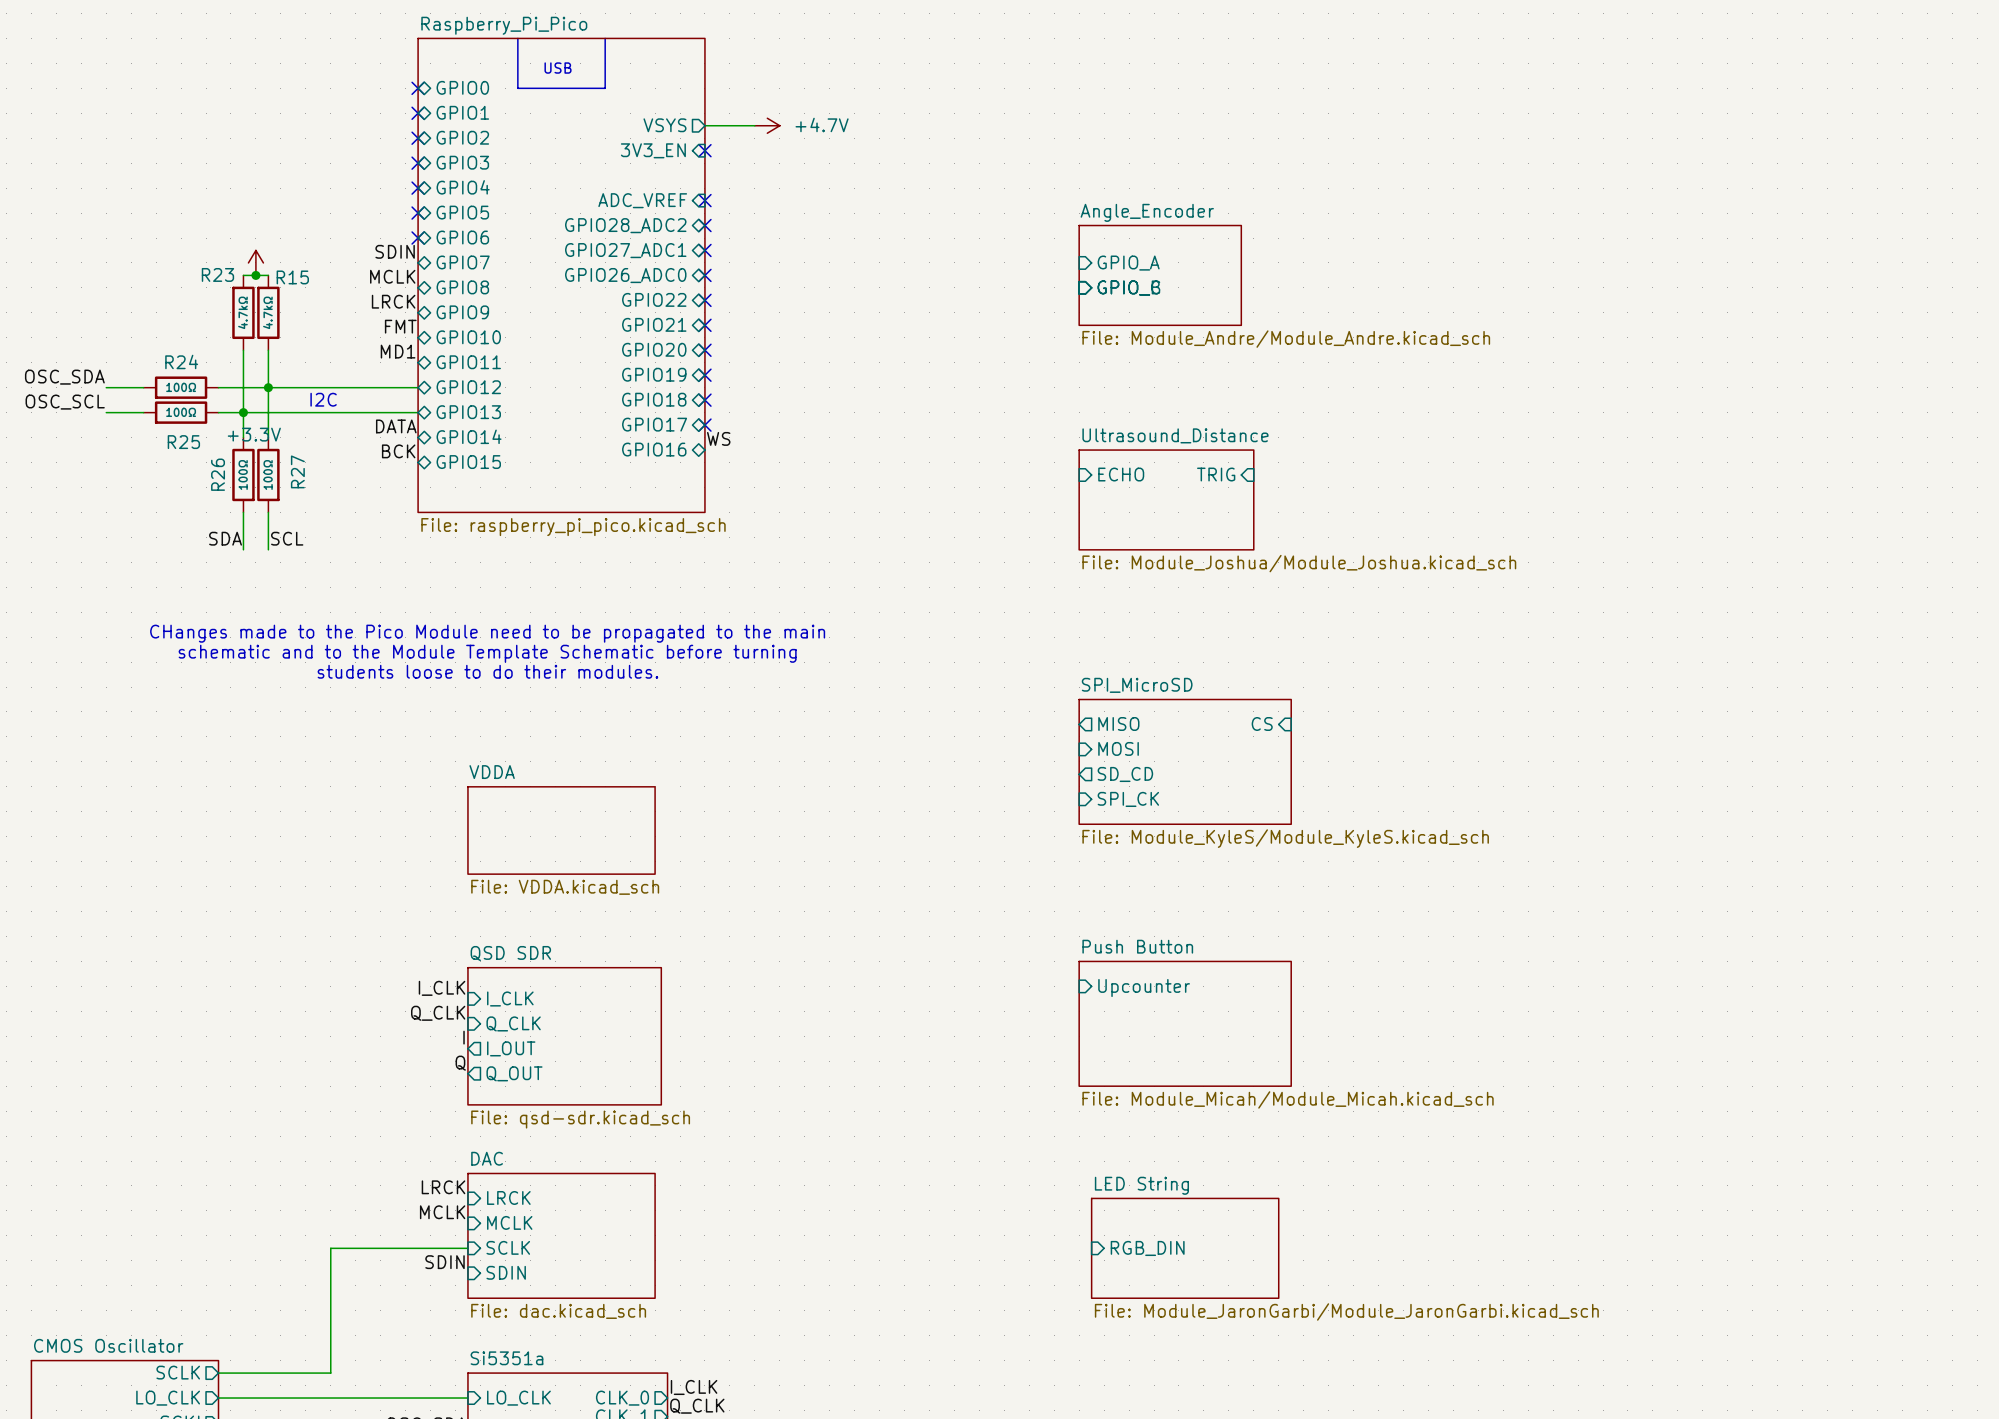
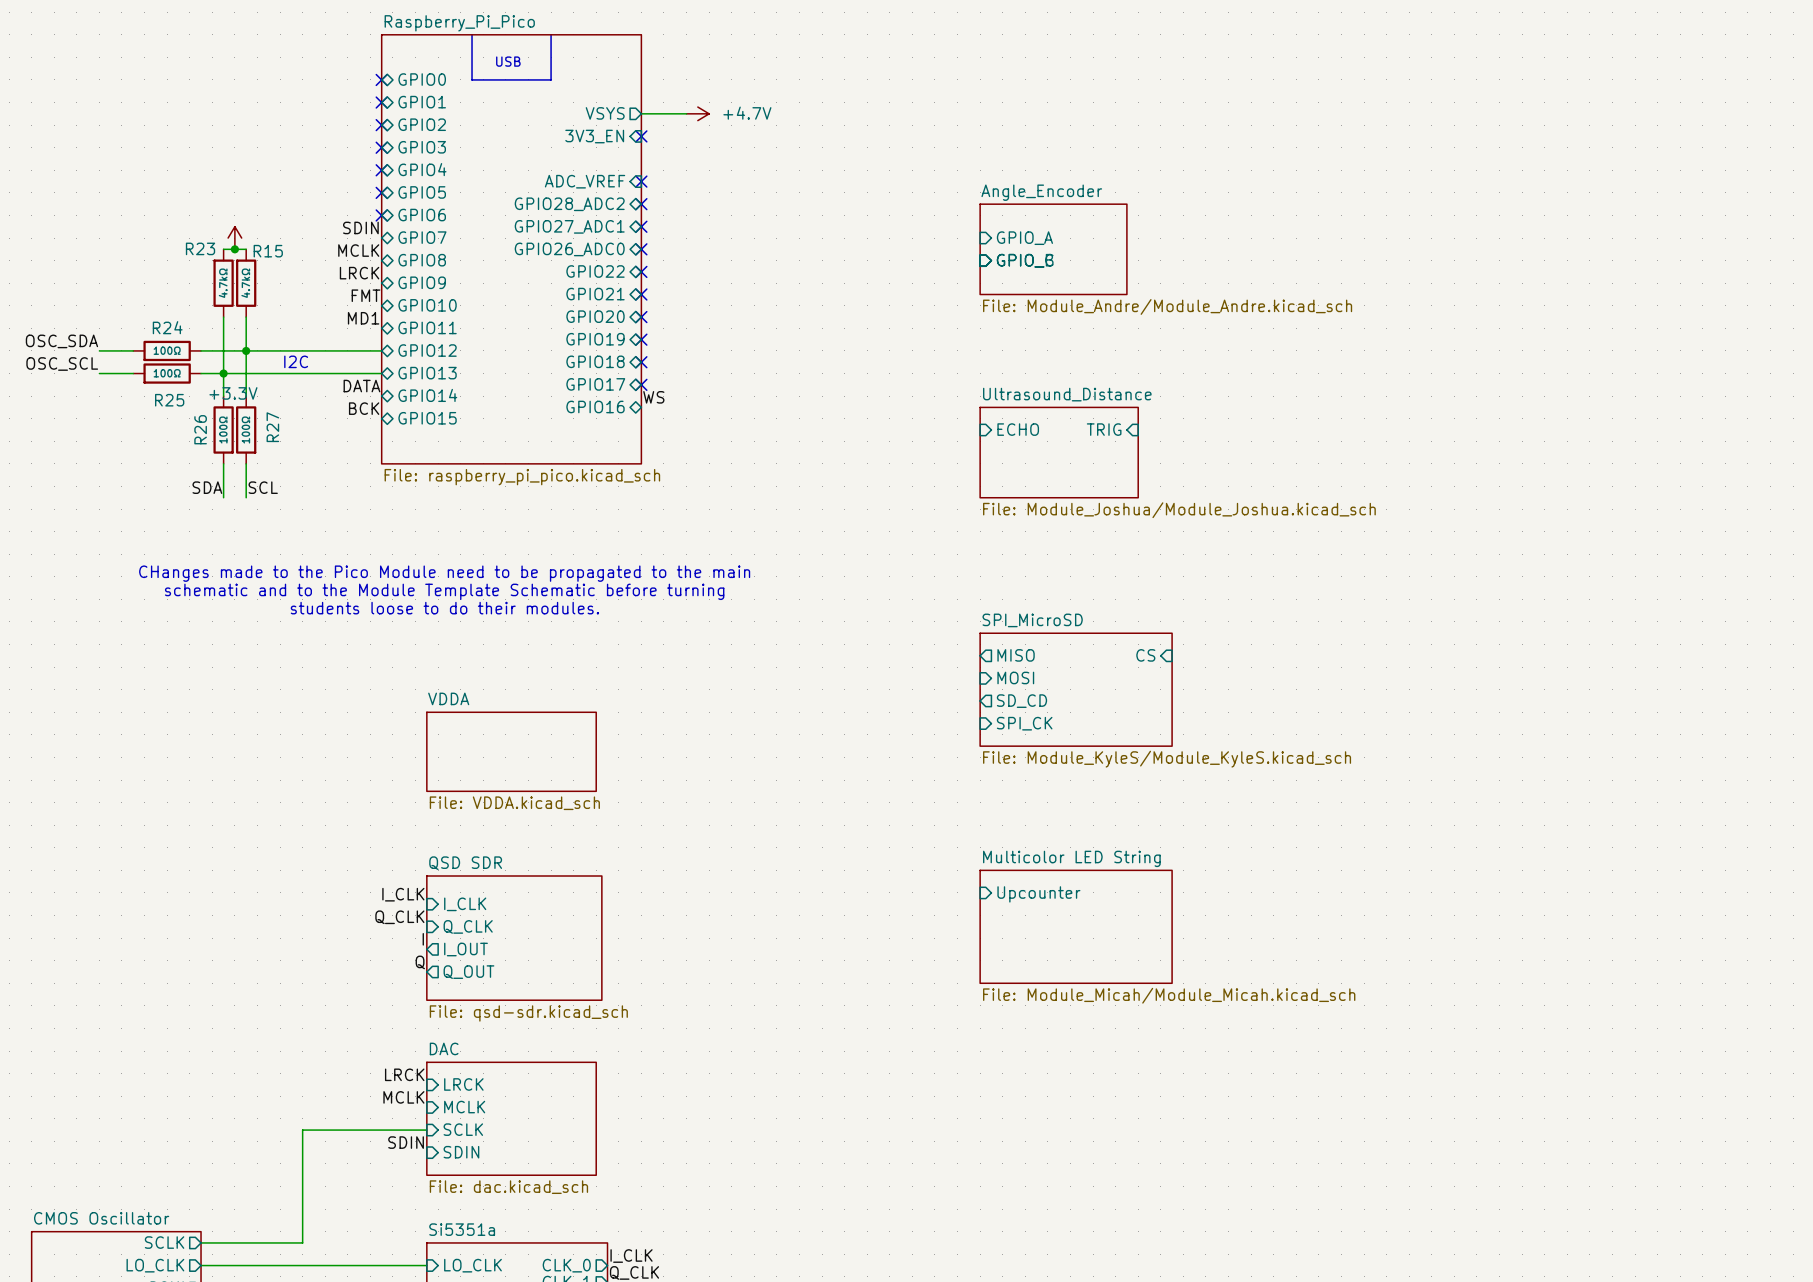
sheet Push Button name: Push Button (1137, 946) -> Multicolor LED String (1071, 858)
sheet pin: RGB_DIN (1147, 1248) -> none
sheet LED String: File: Module_JaronGarbi/Module_JaronGarbi.kicad_sch (1185, 1248) -> none

